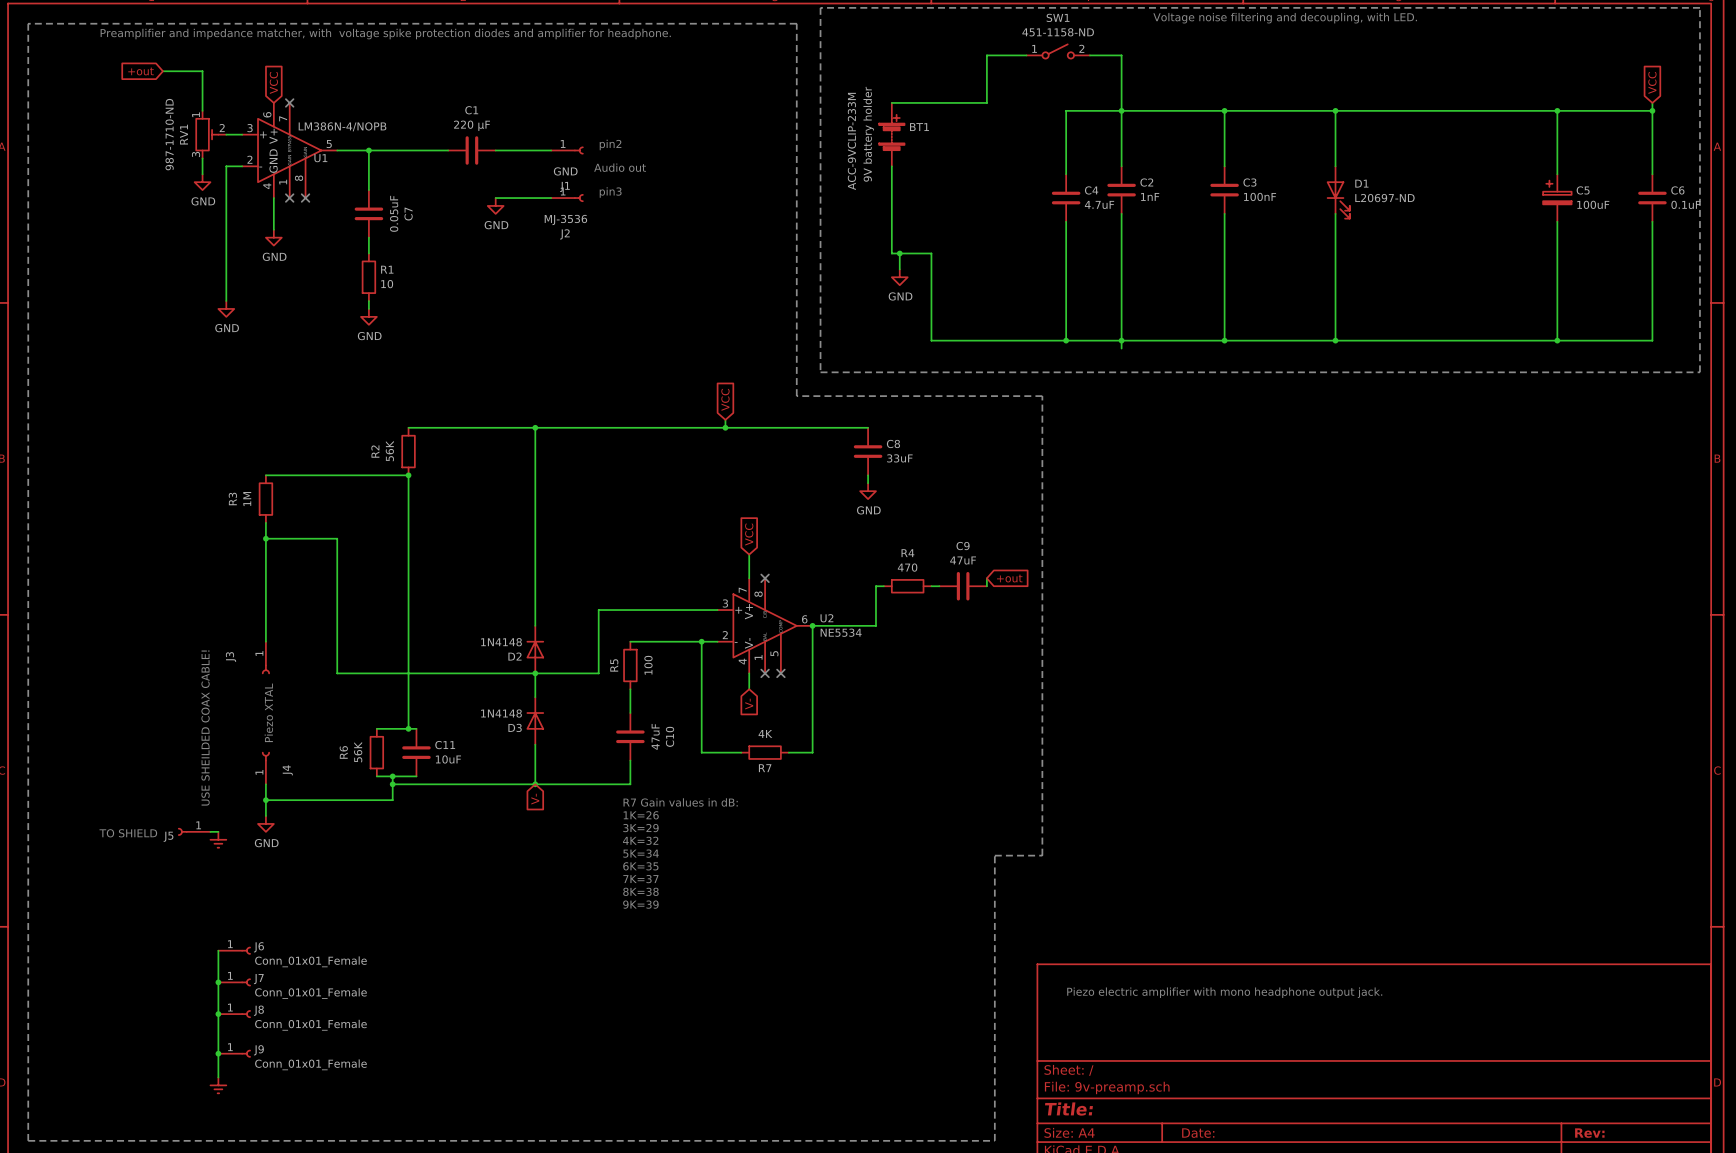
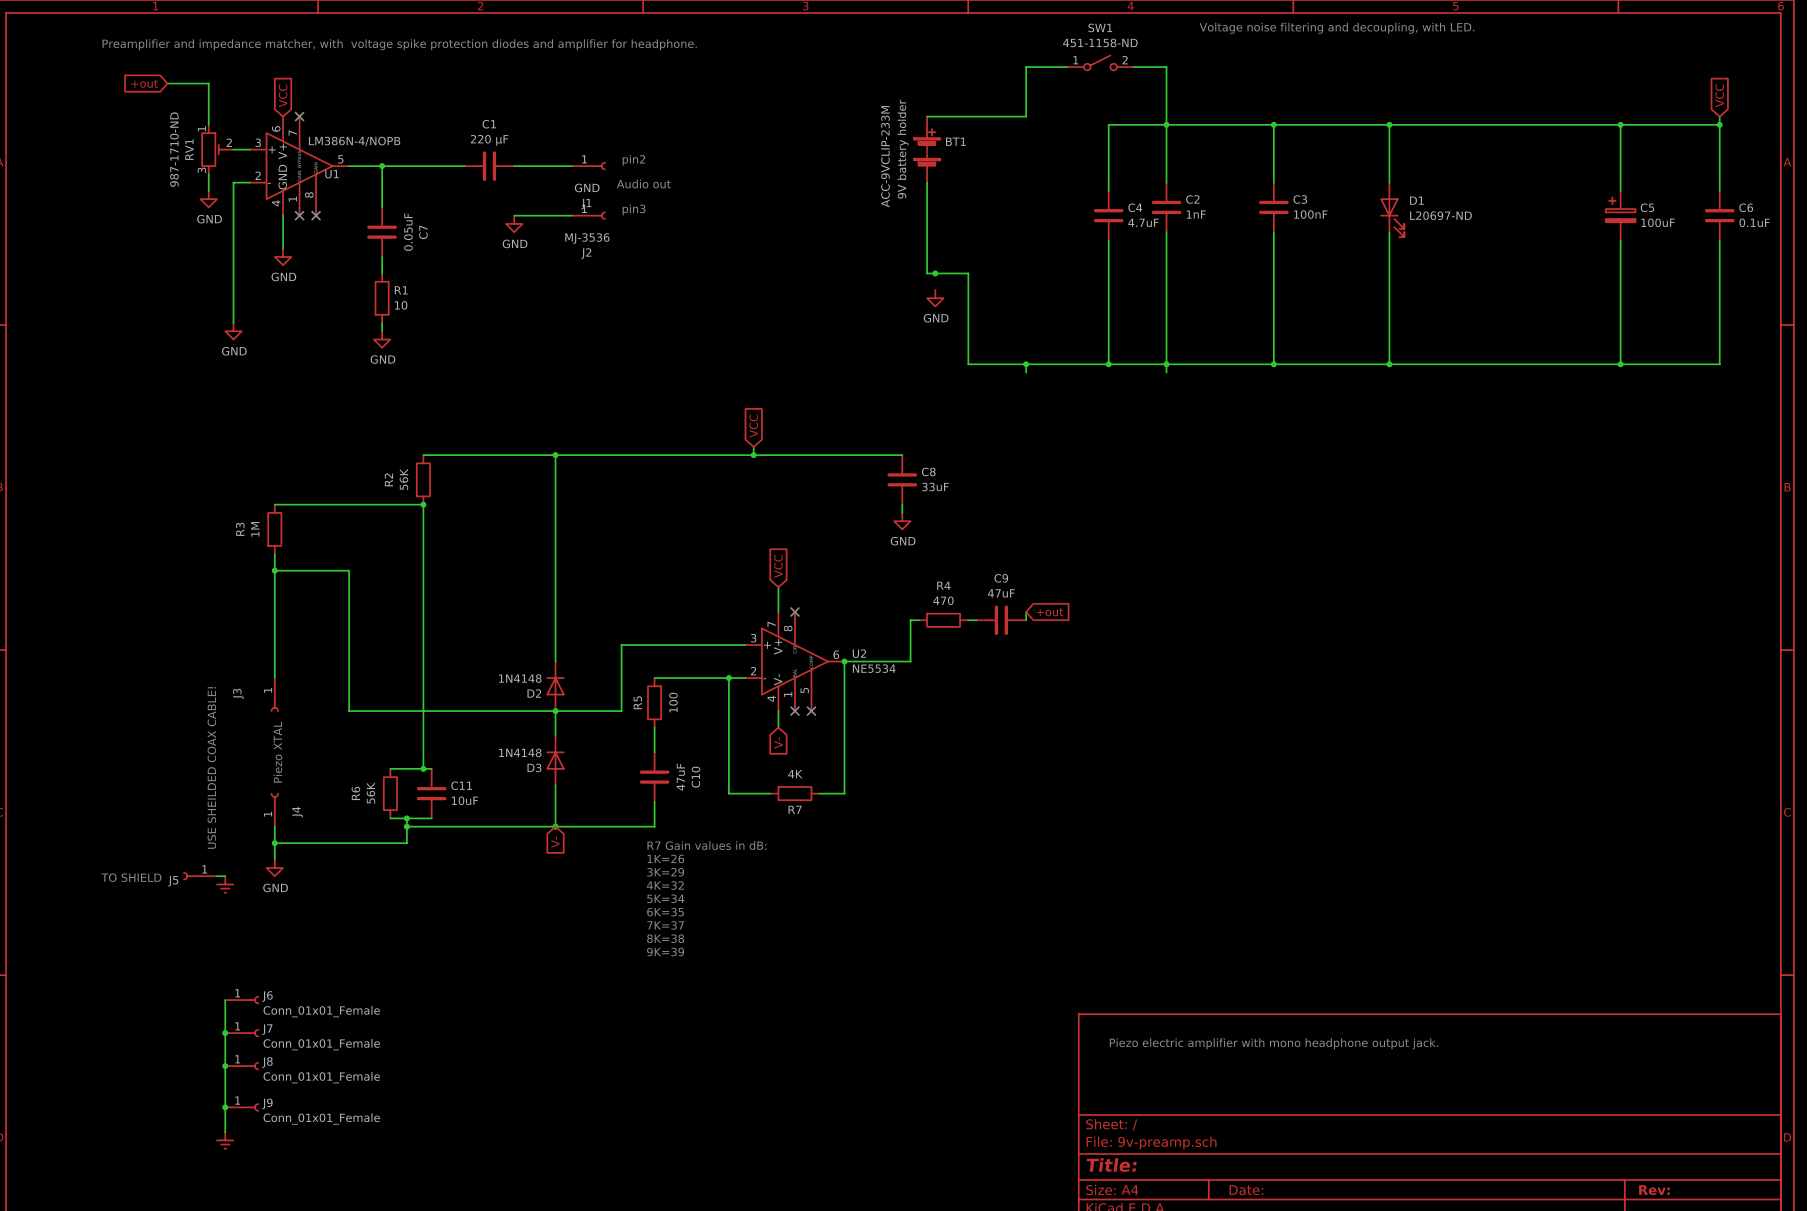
line: (820, 7) (820, 372) (1699, 372) (1699, 7) (820, 7) -> none
line: (28, 23) (28, 1140) (994, 1140) (994, 855) (1042, 855) (1042, 396) (796, 396) (796, 23) (28, 23) -> none
wire: (899, 253) (899, 269) -> none
wire: none -> (1026, 364) (1026, 372)
junction: none -> (1026, 364)

